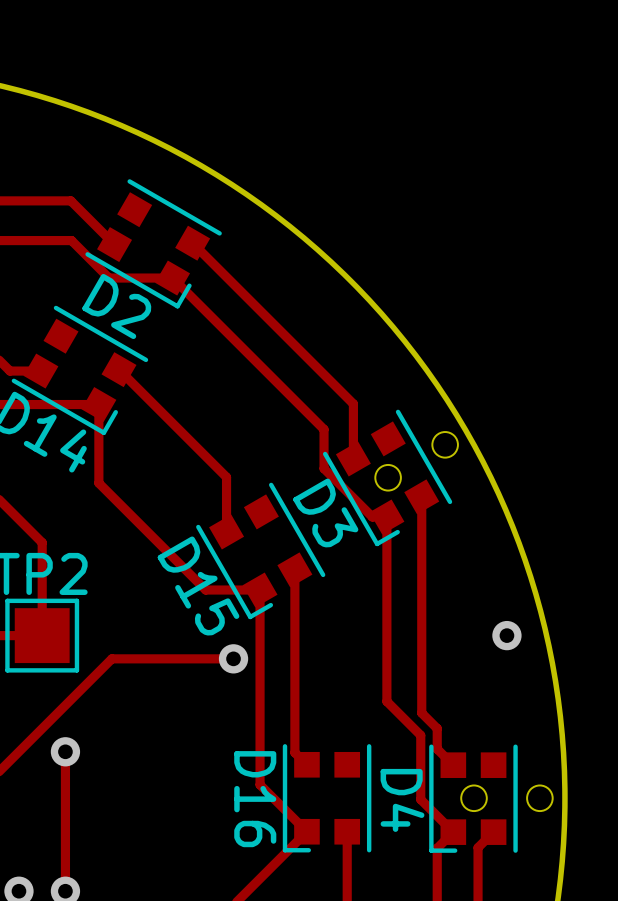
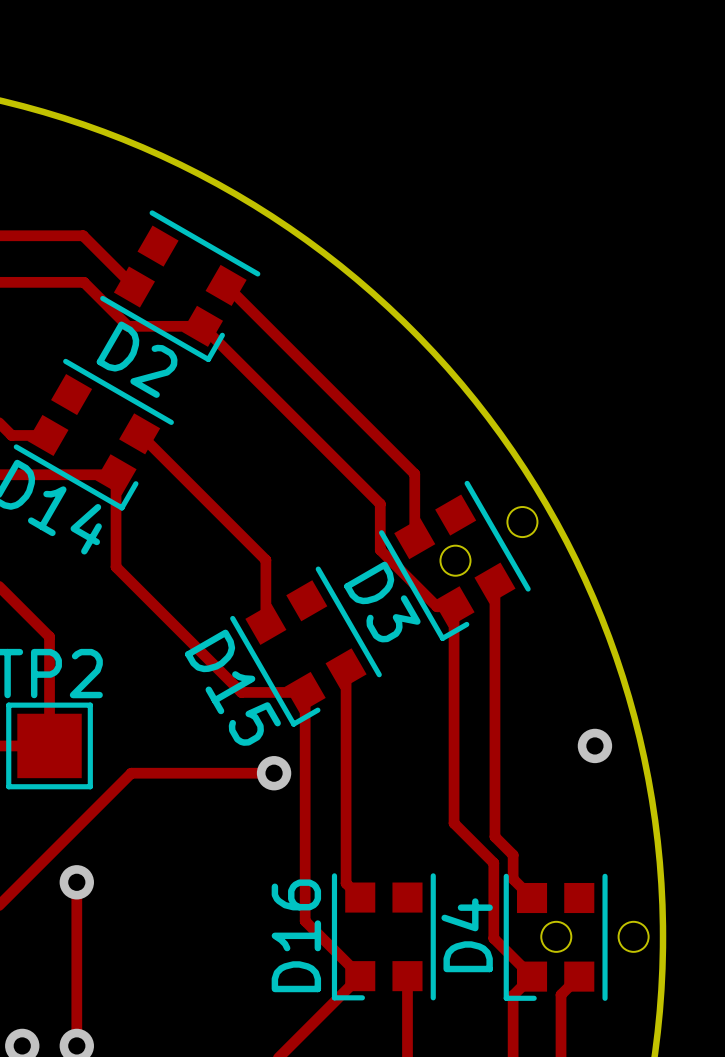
D16 name rotation: 0° (255, 799) -> 180° (296, 935)
D4 name rotation: 0° (402, 800) -> 180° (467, 935)

